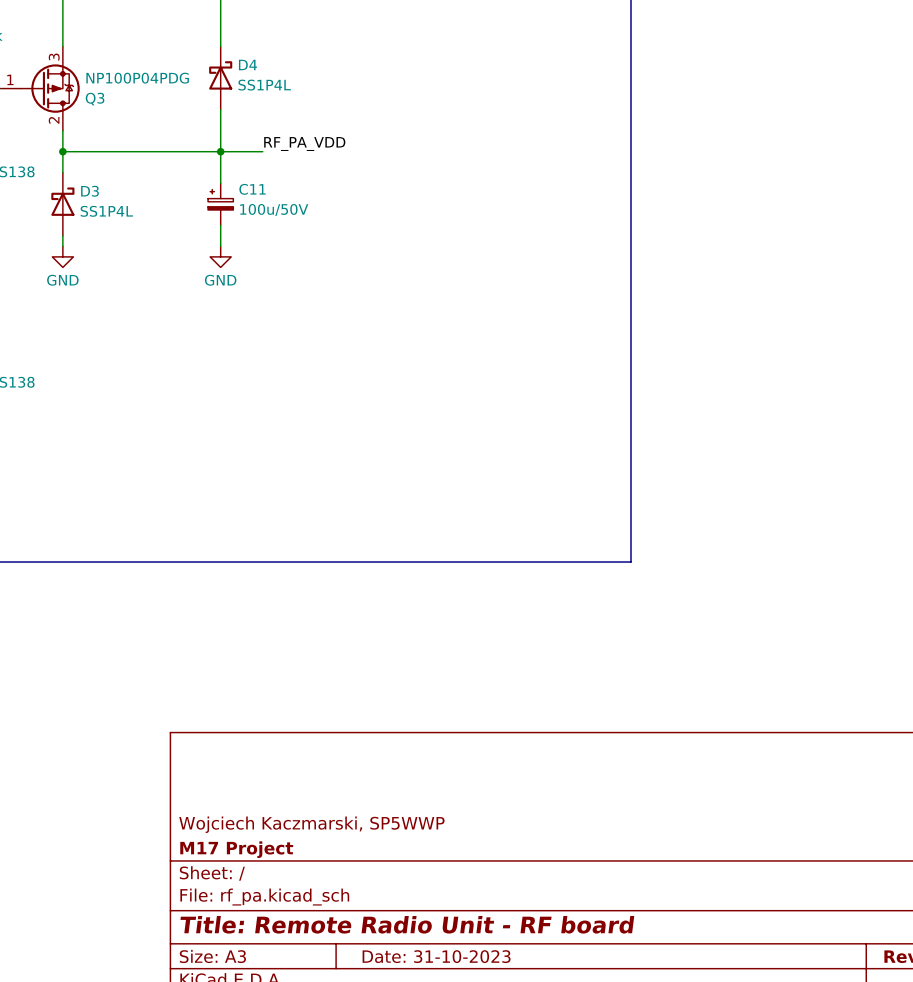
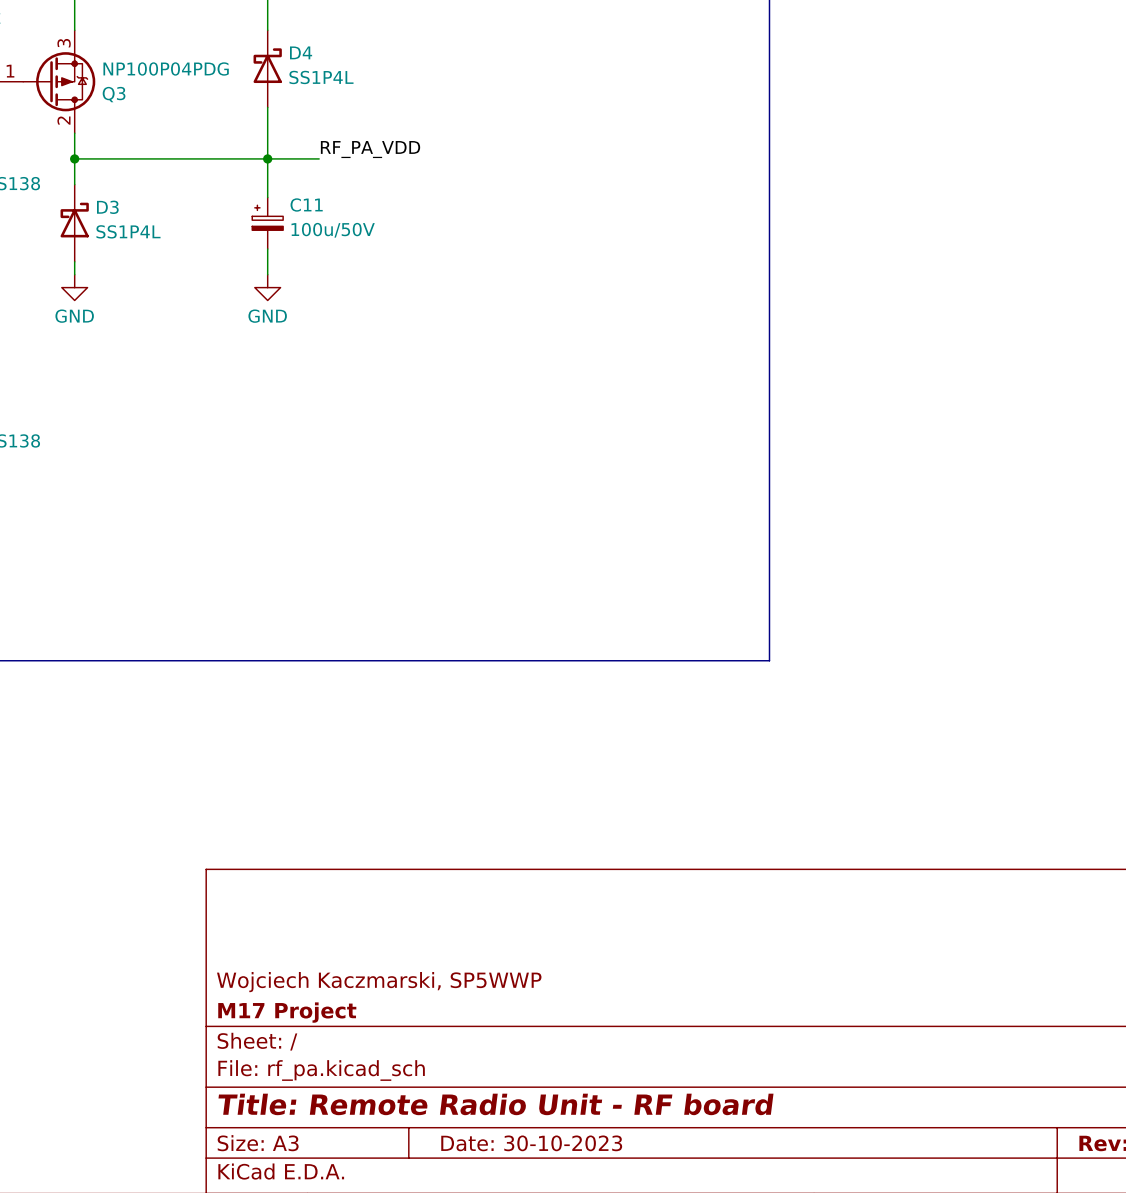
title block: Date: 31-10-2023 (436, 956) -> Date: 30-10-2023 (531, 1143)

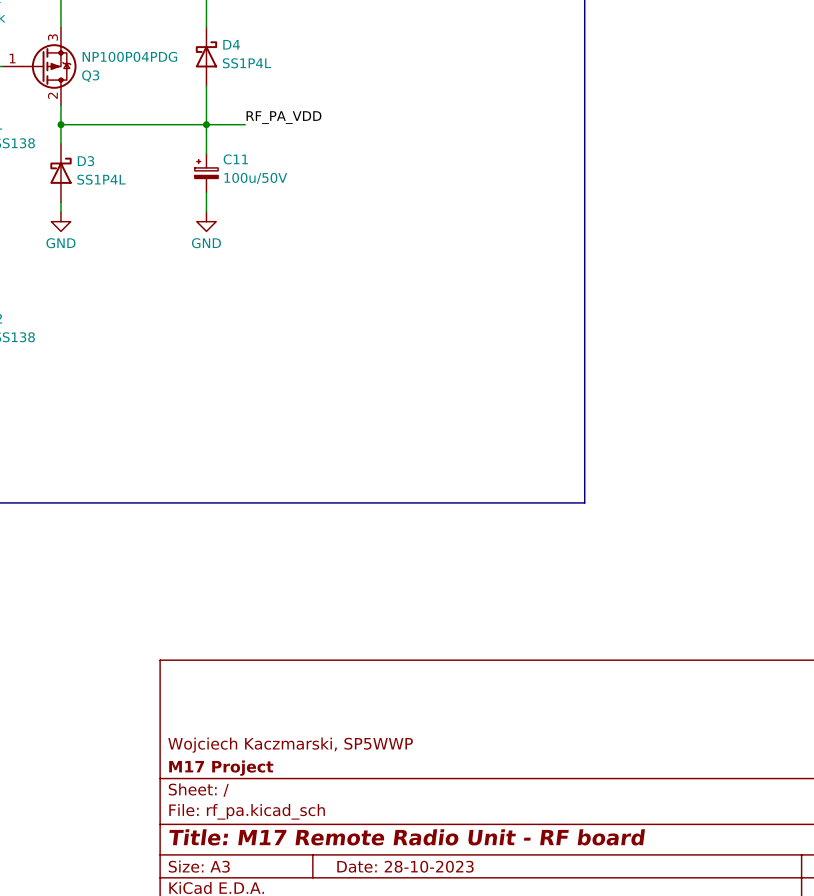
title block: Title: Remote Radio Unit - RF board (495, 1104) -> Title: M17 Remote Radio Unit - RF board (407, 837)
title block: Date: 30-10-2023 (531, 1143) -> Date: 28-10-2023 (405, 866)

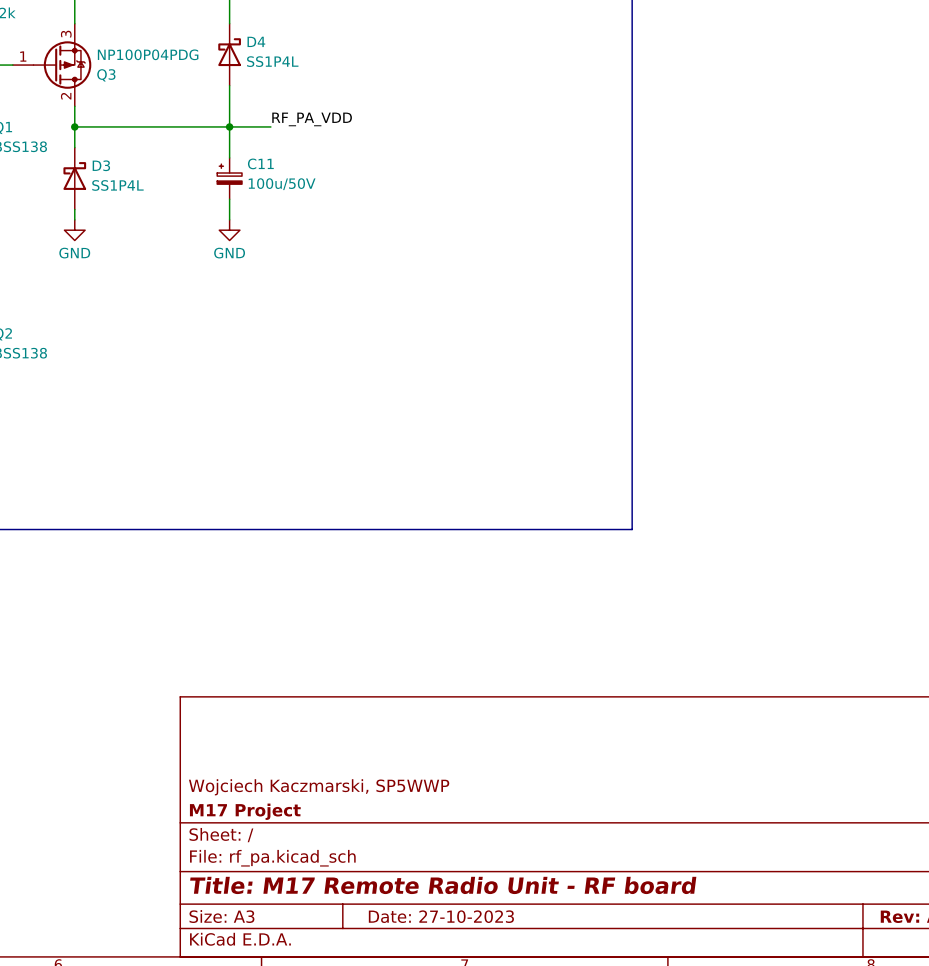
title block: Date: 28-10-2023 (405, 866) -> Date: 27-10-2023 (441, 916)

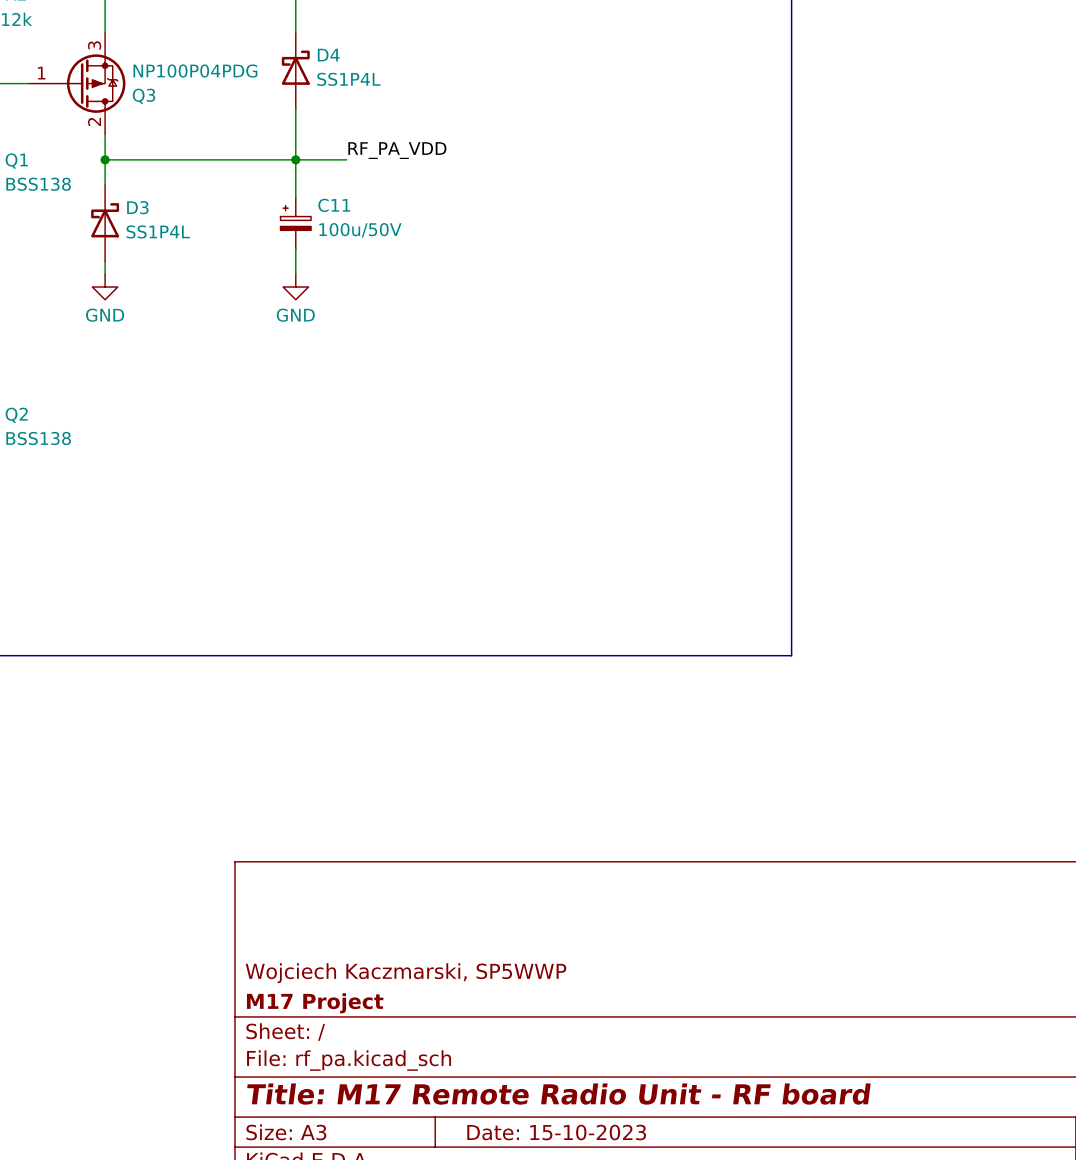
title block: Date: 27-10-2023 (441, 916) -> Date: 15-10-2023 (556, 1132)

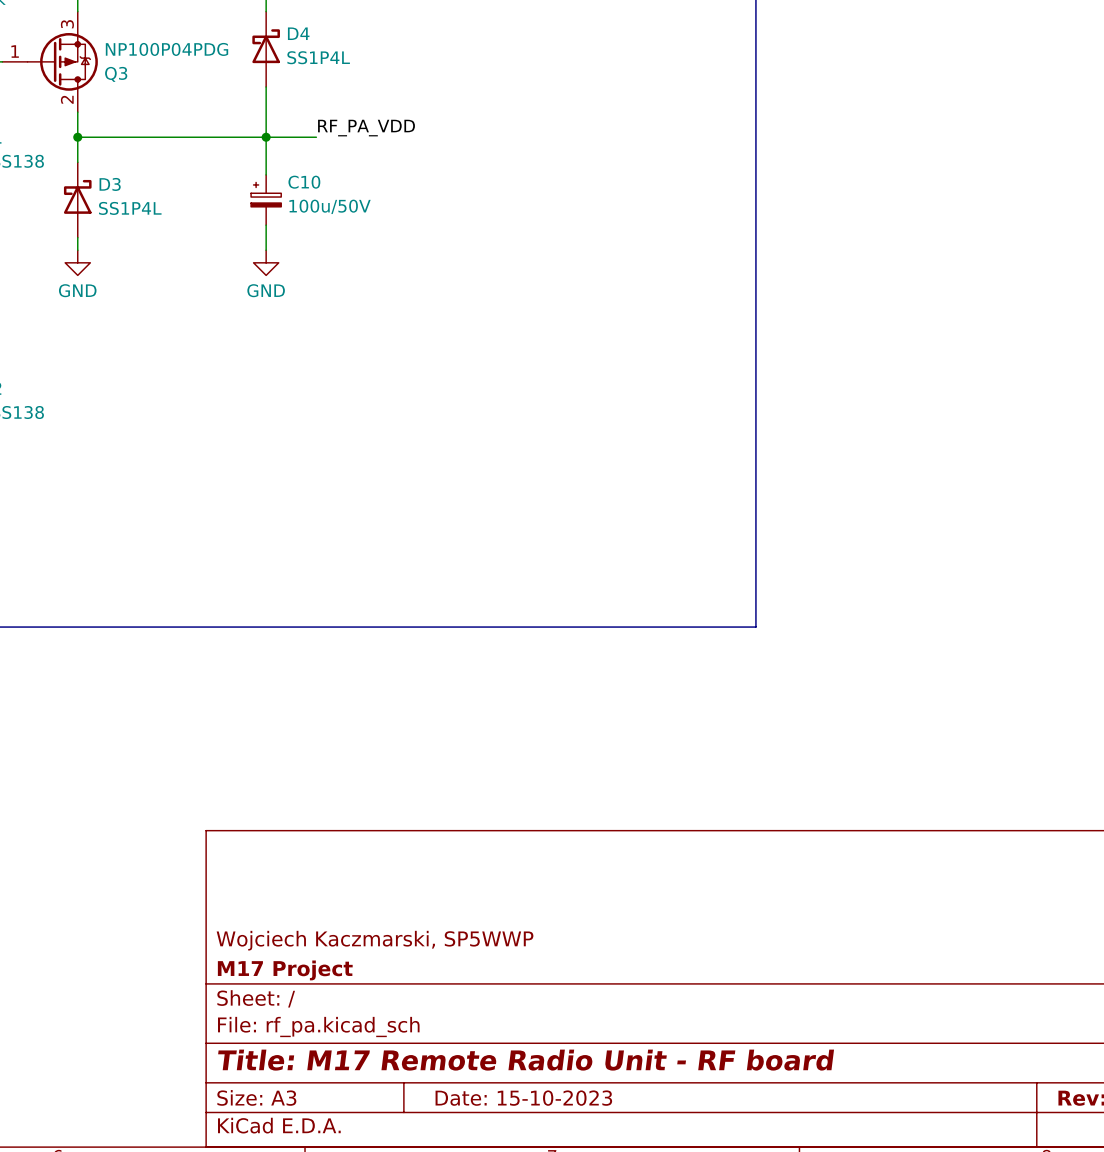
C11 name: C11 (334, 205) -> C10 (304, 182)

